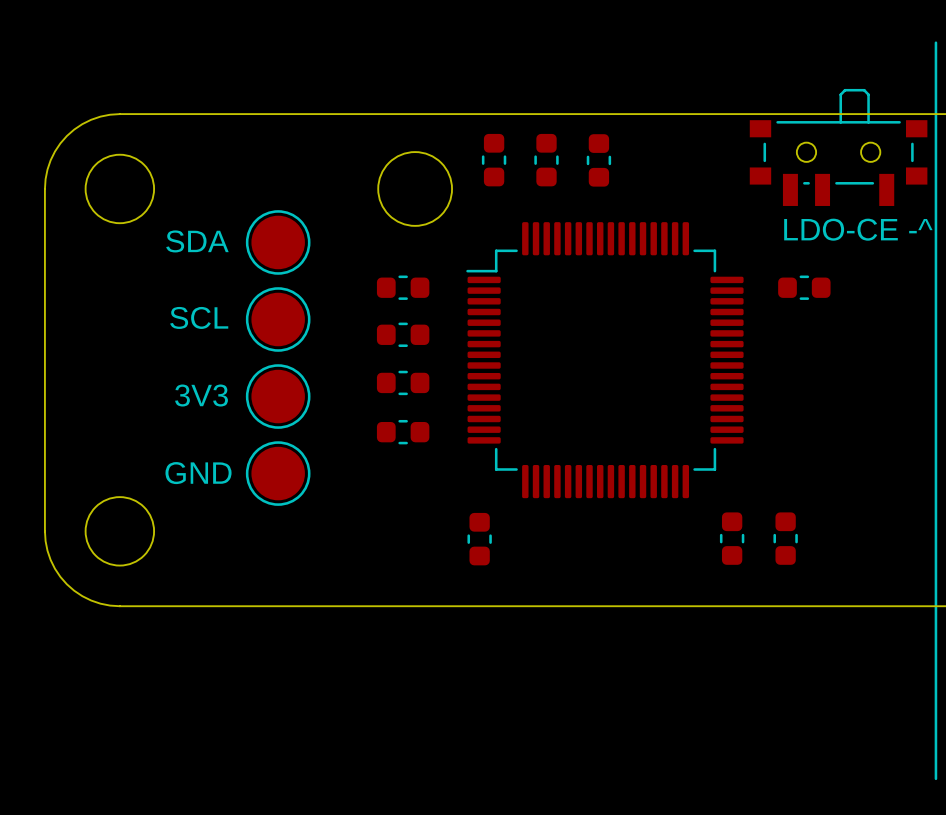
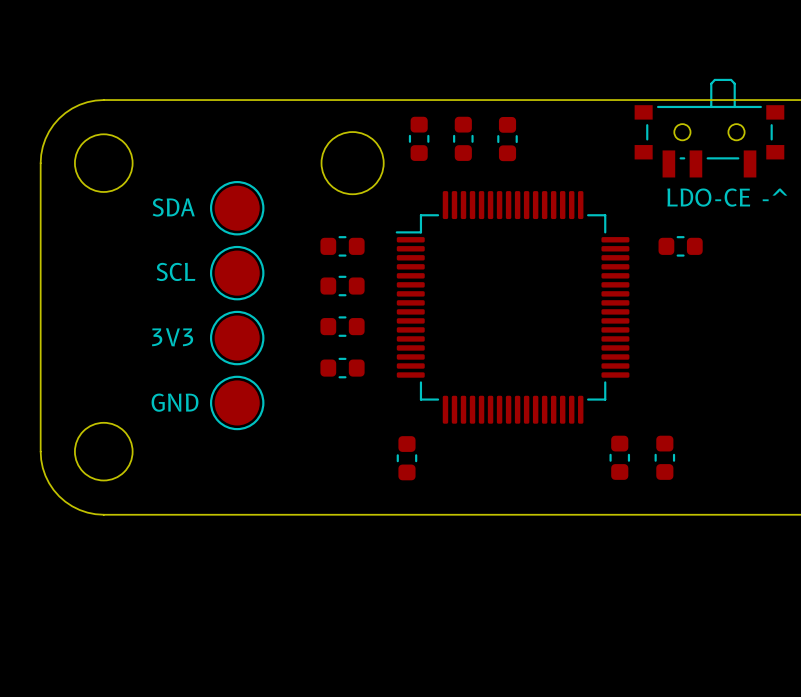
line: (935, 42) (935, 778) -> none

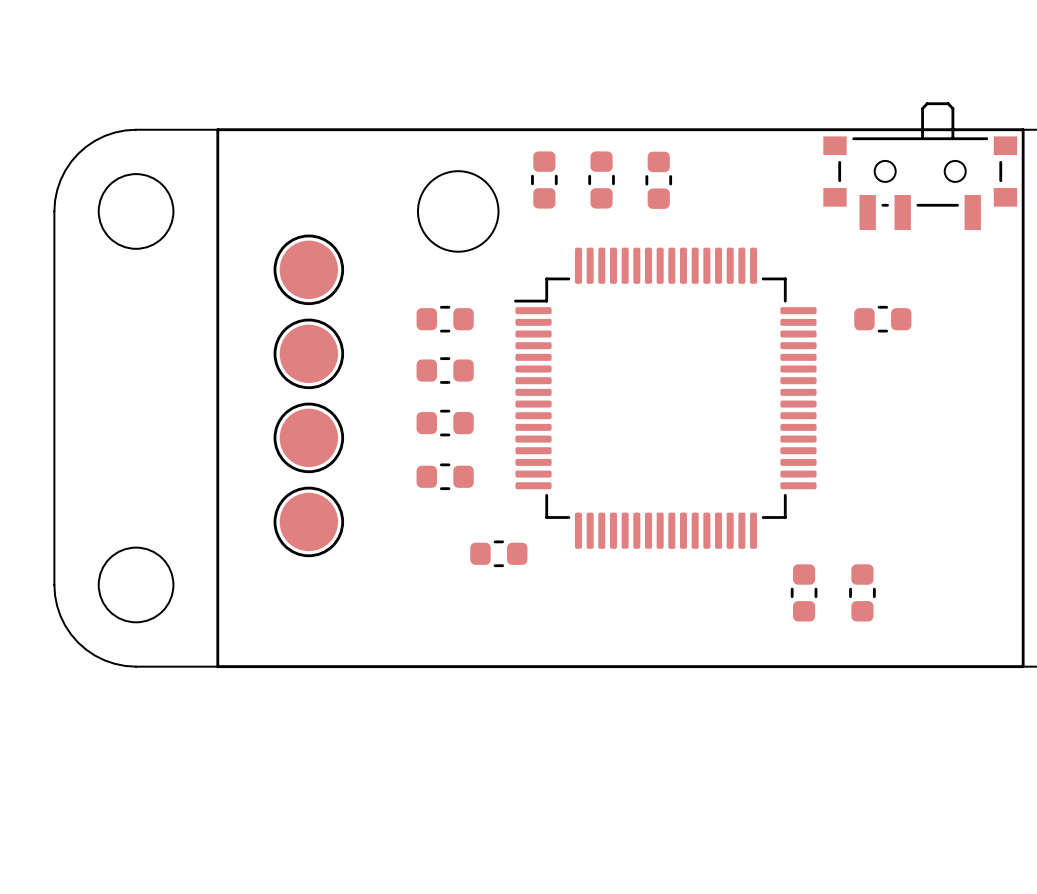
line: none -> (217, 129) (1023, 129) (1023, 666) (217, 666) (217, 129)
text: LDO-CE -^ (727, 197) -> none
text: SDA (173, 207) -> none
text: SCL (175, 271) -> none
text: 3V3 (172, 337) -> none
text: GND (175, 402) -> none
part rotation: 0° (406, 458) -> 90° clockwise (498, 553)
part position: (406, 458) -> (498, 553)

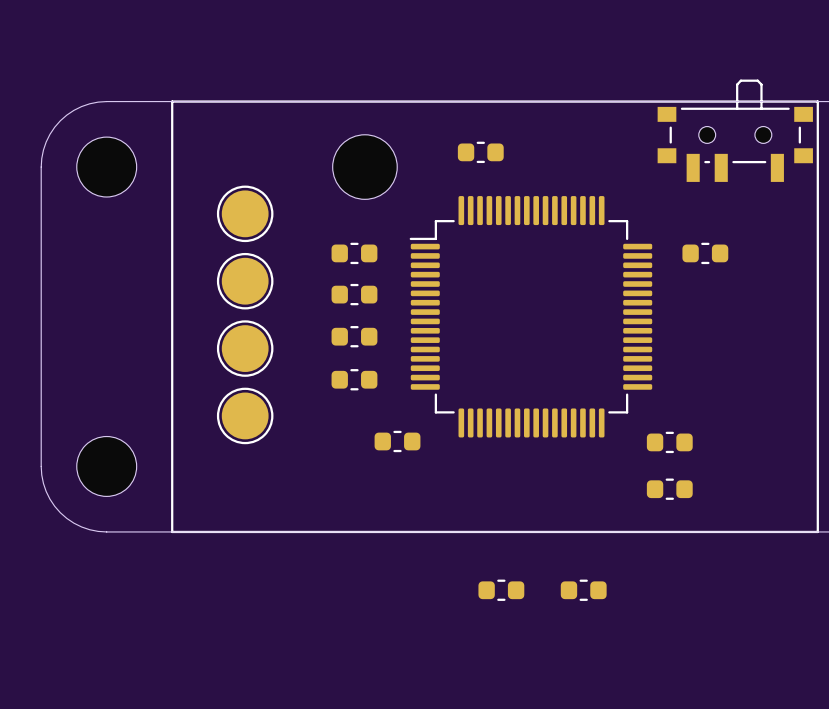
part: (544, 180) -> none
part rotation: 0° (601, 180) -> 90° clockwise (480, 152)
part: (658, 180) -> none
part: none -> (669, 442)
part: (804, 592) -> none
part: (862, 592) -> none
part: none -> (669, 489)
part: none -> (501, 590)
part: none -> (583, 590)

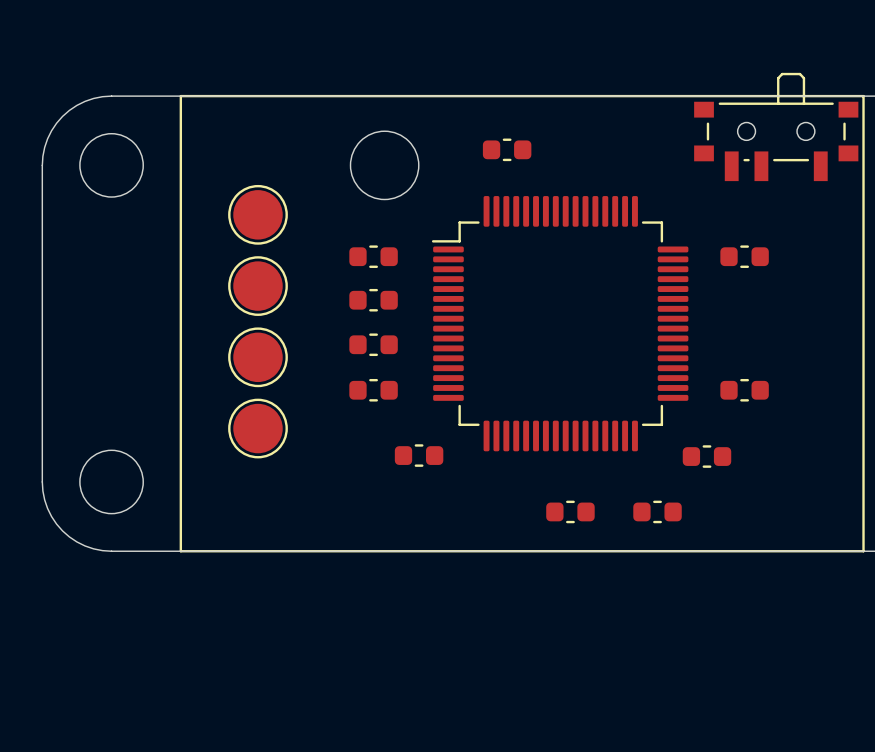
part: none -> (744, 390)
part position: (669, 489) -> (657, 511)
part: none -> (570, 511)
part: (501, 590) -> none
part: (583, 590) -> none

